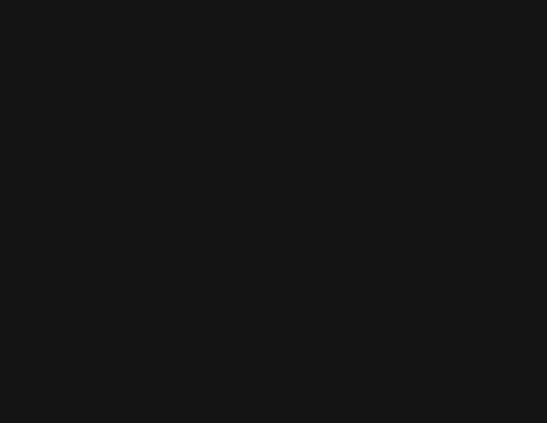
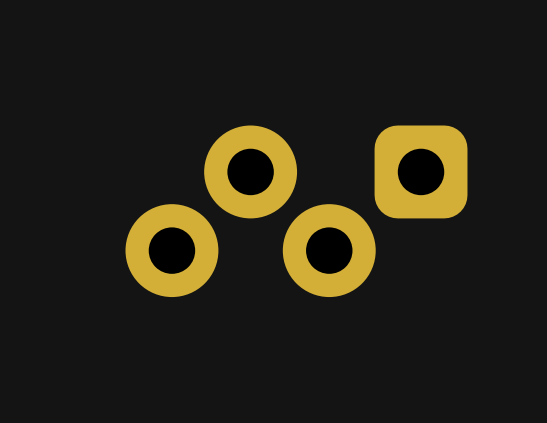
part: none -> (296, 211)

